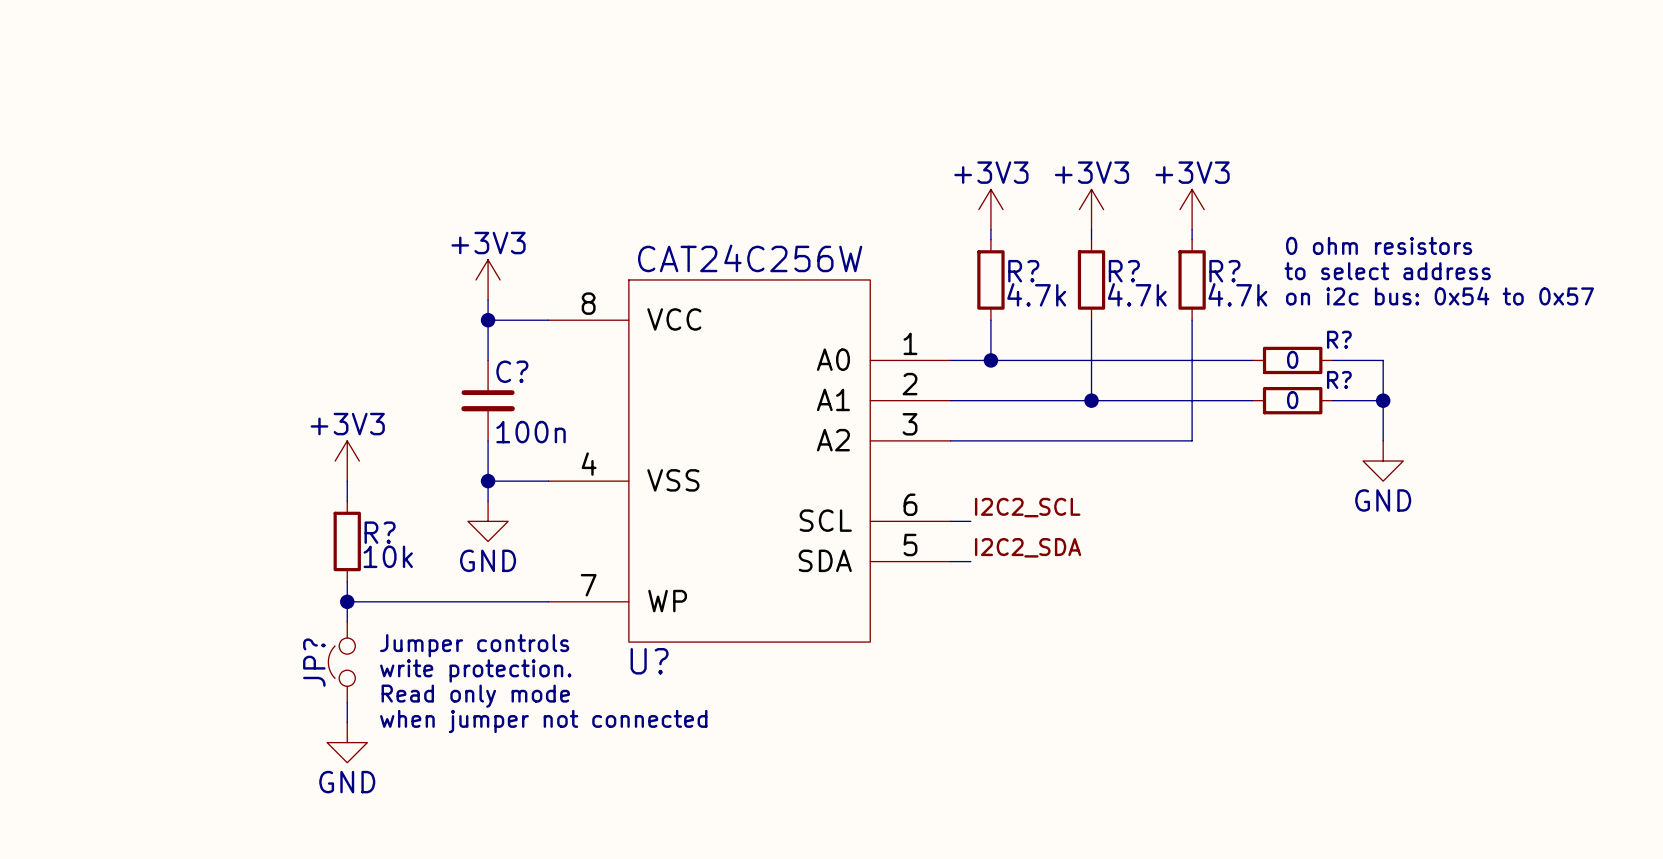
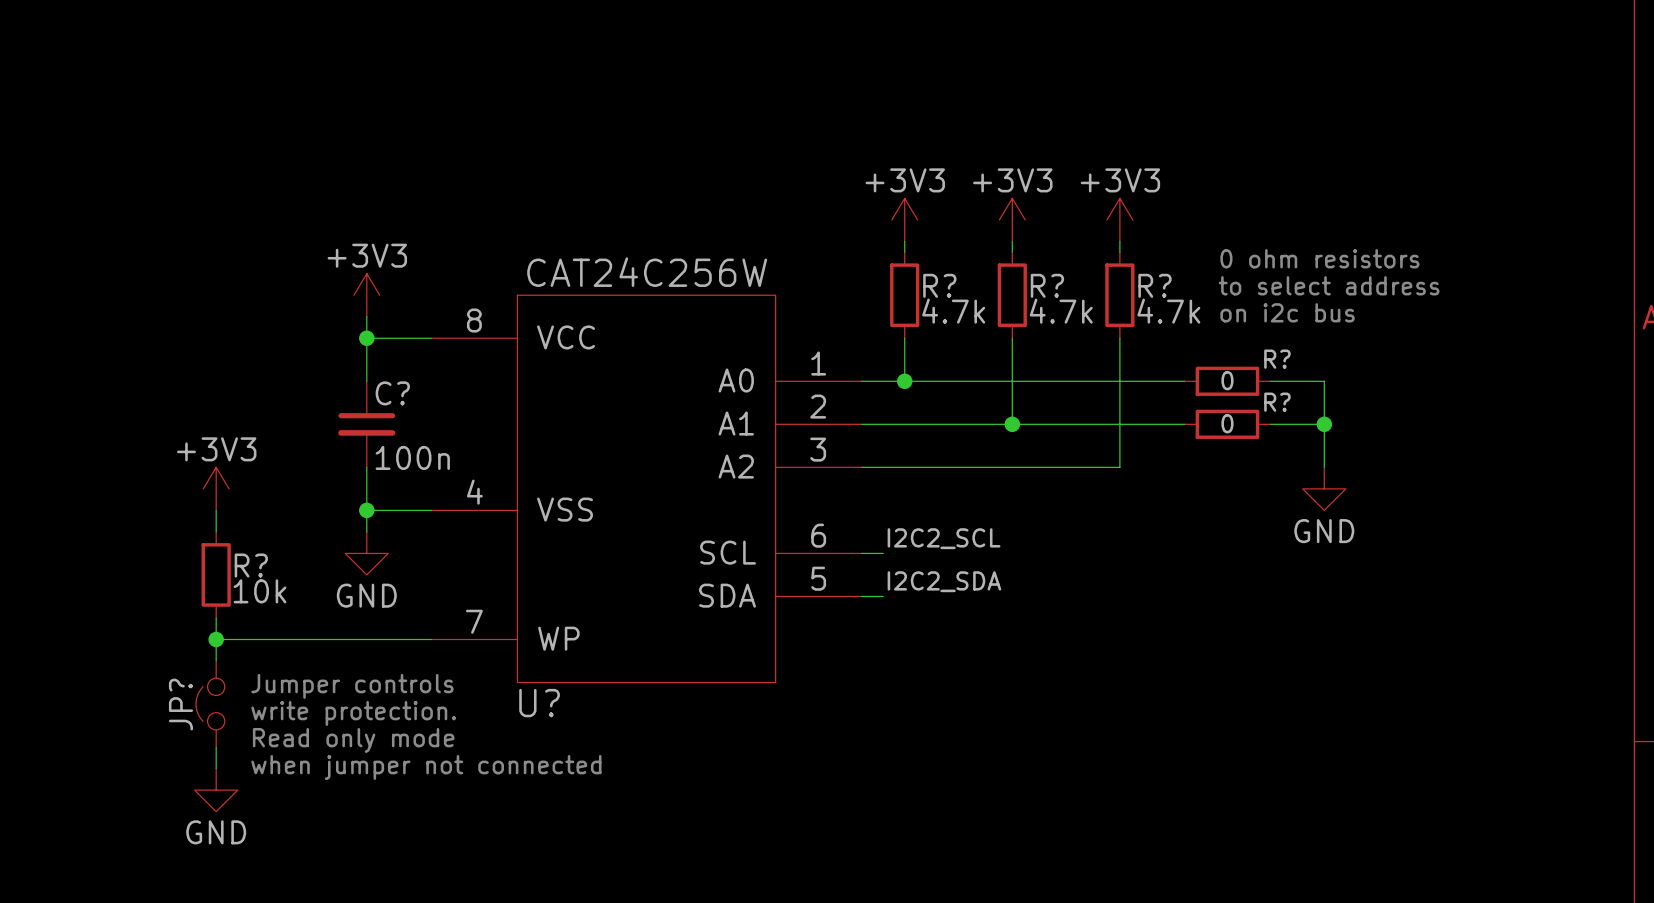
text: on i2c bus: 0x54 to 0x57 (1439, 296) -> on i2c bus (1287, 312)

